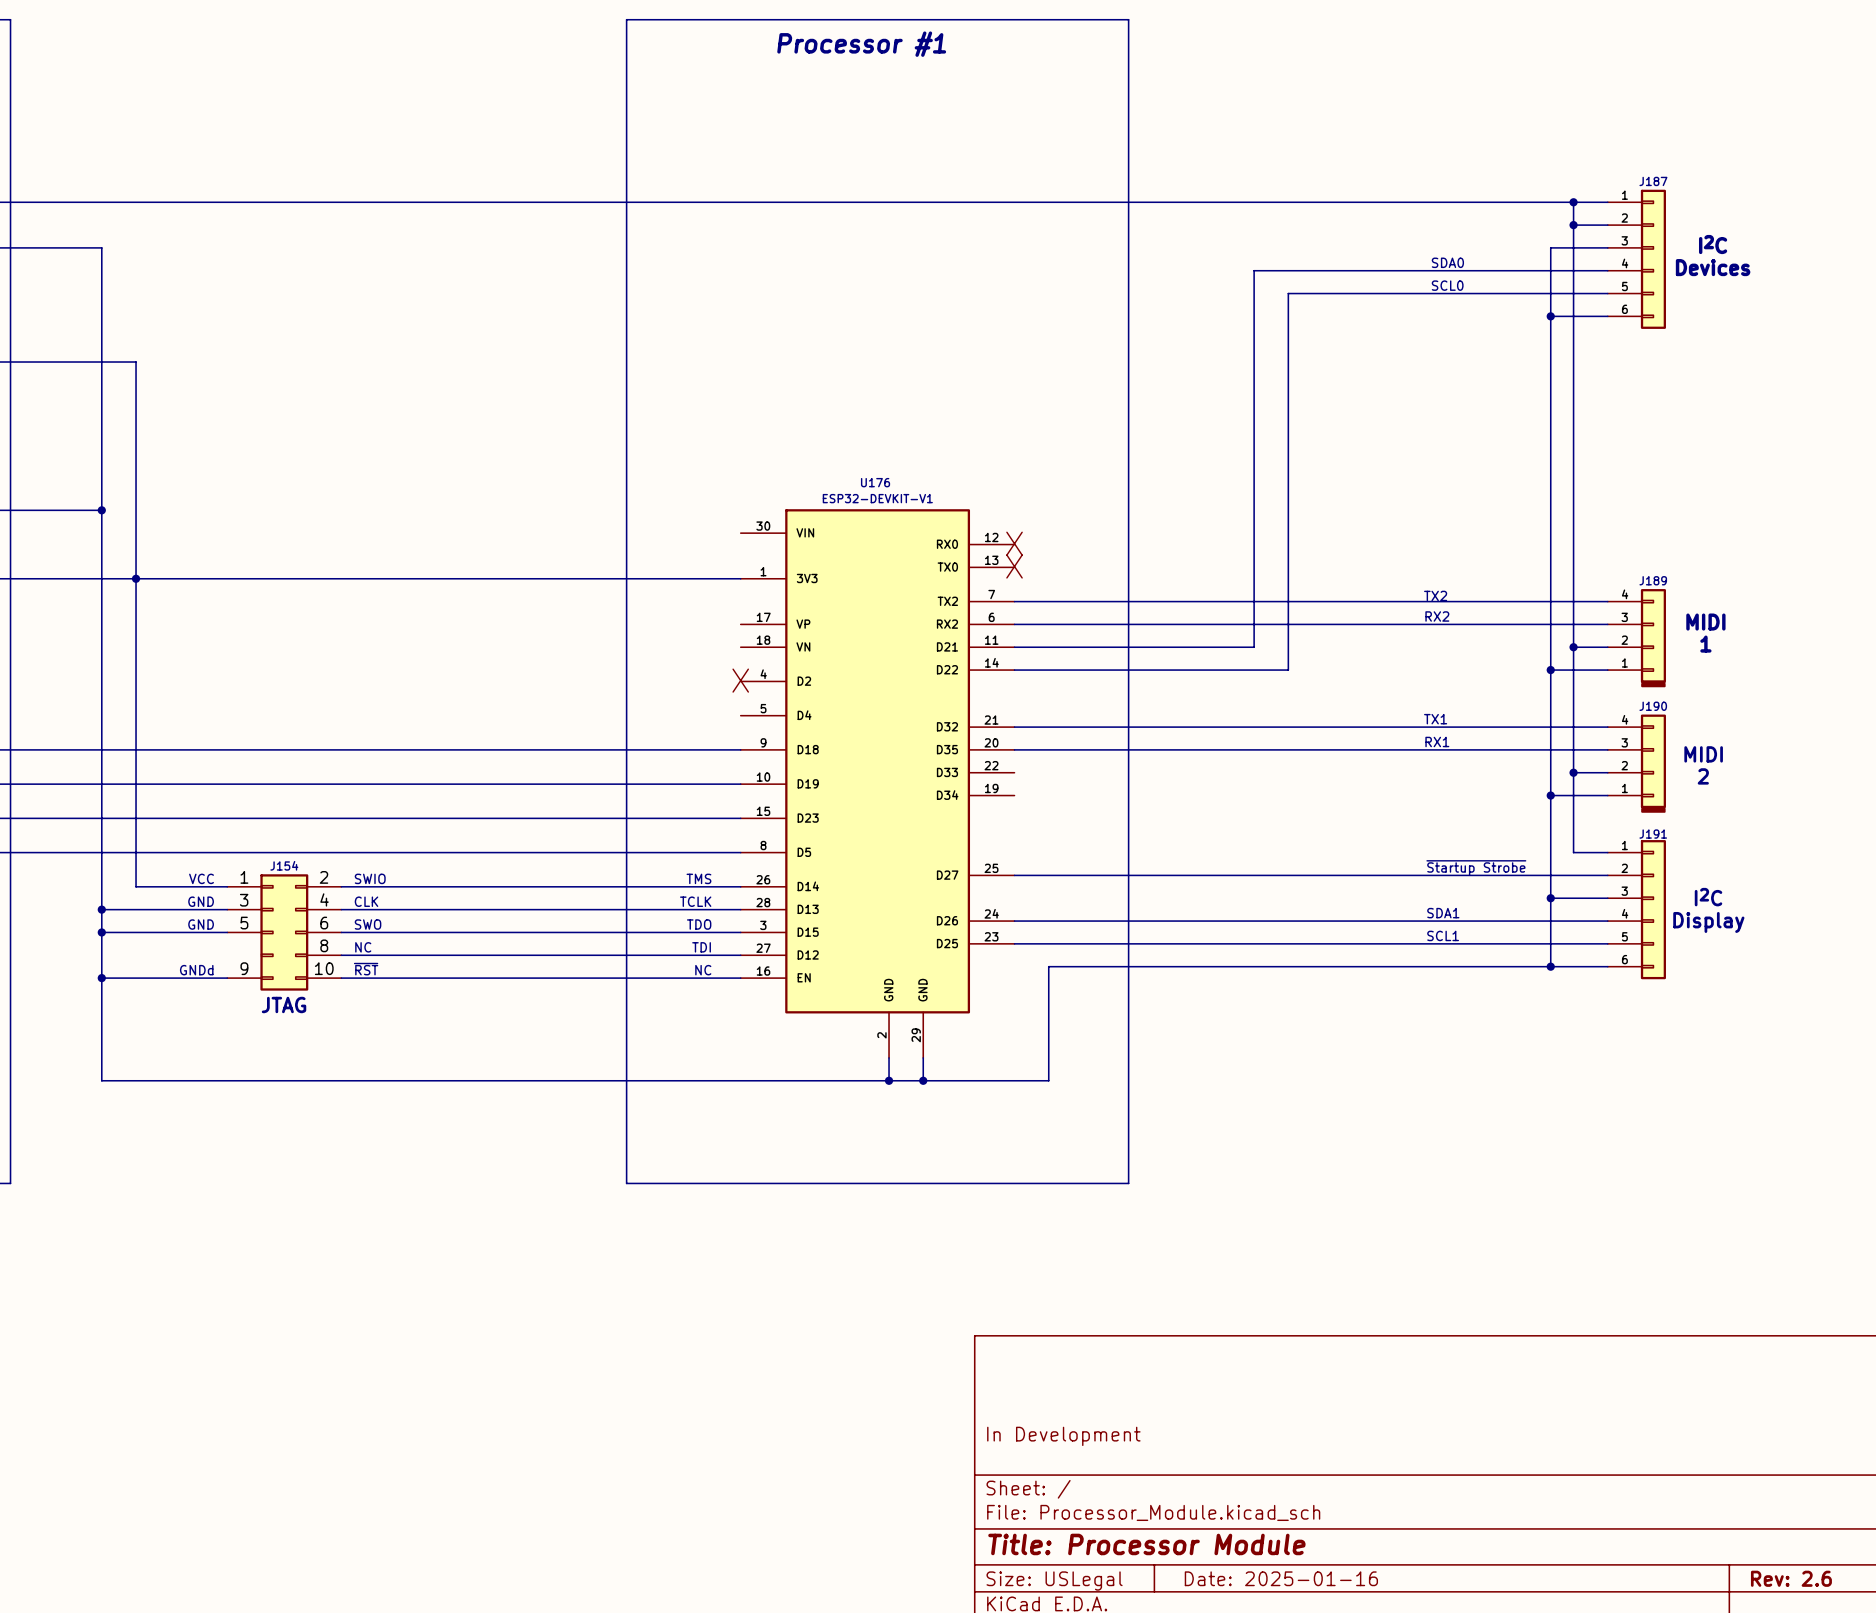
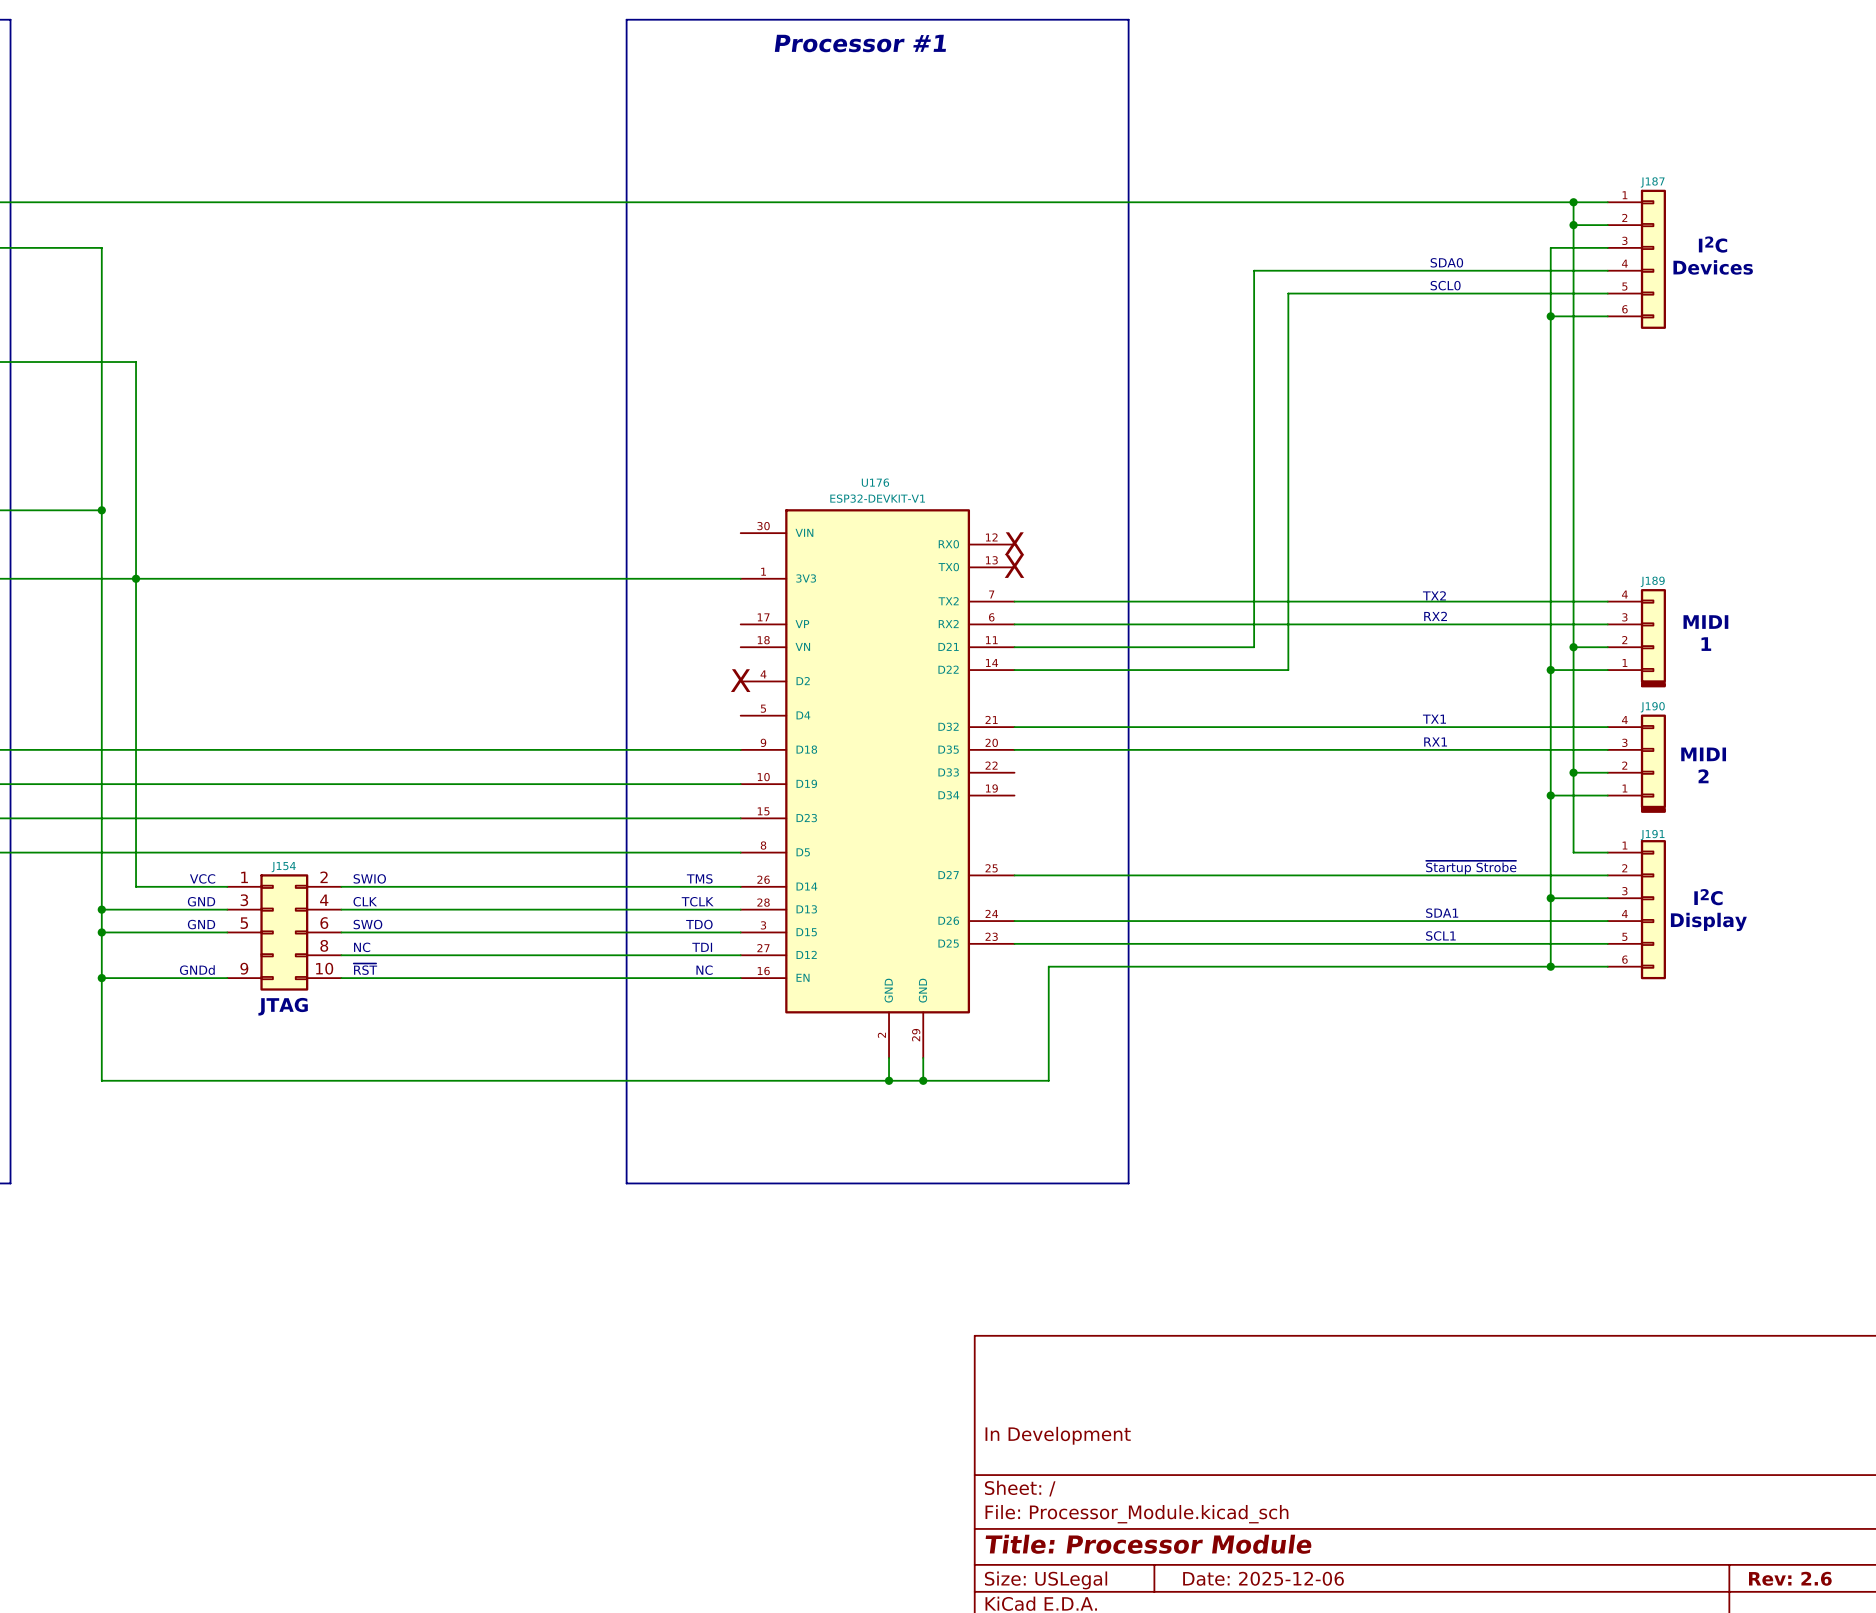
title block: Date: 2025-01-16 (1281, 1578) -> Date: 2025-12-06 (1263, 1578)

